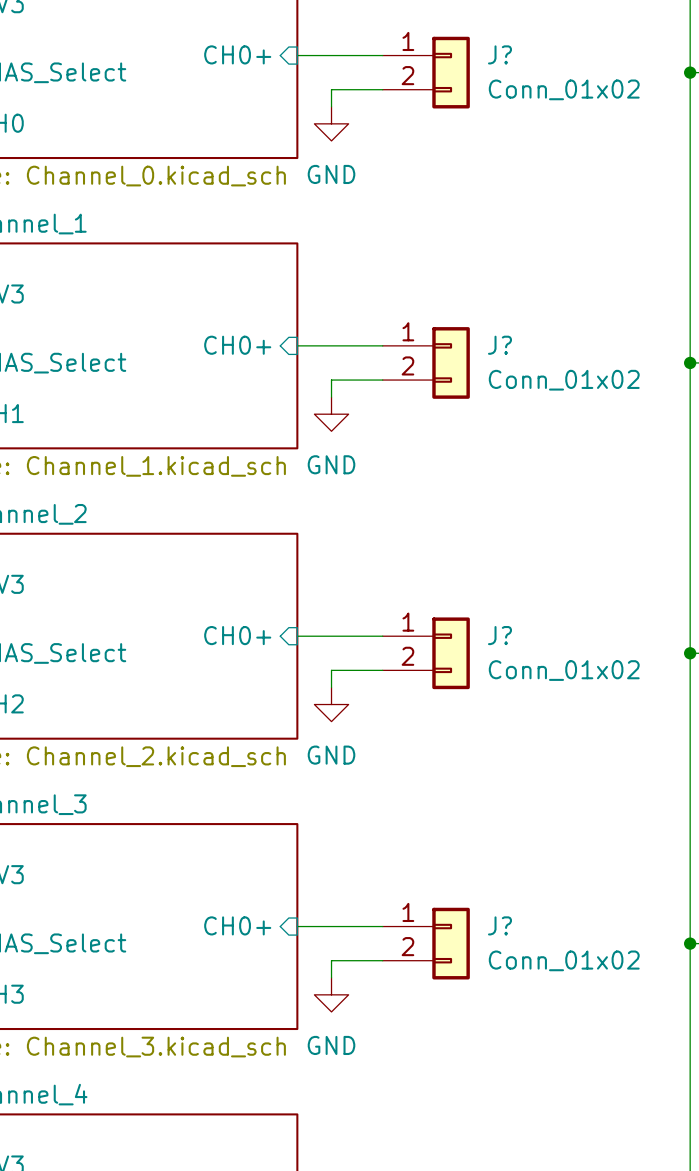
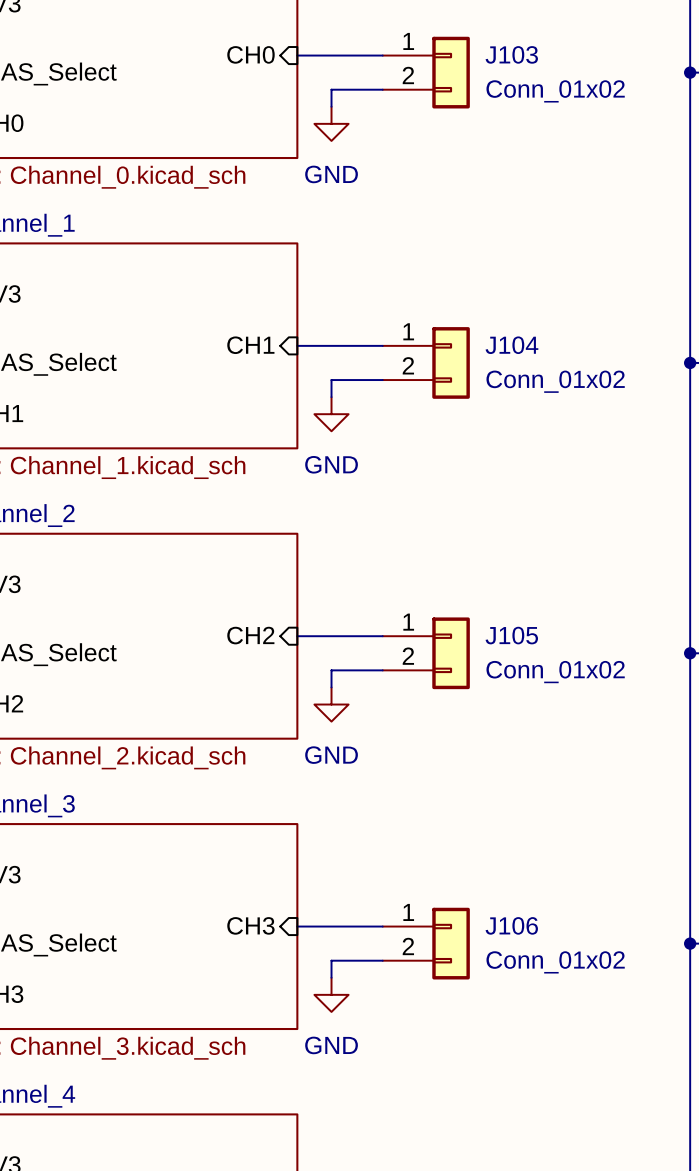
sheet pin: CH0+ (237, 54) -> CH0 (250, 54)
J? name: J? (499, 54) -> J103 (511, 54)
sheet pin: CH0+ (237, 345) -> CH1 (250, 345)
J? name: J? (499, 345) -> J104 (511, 345)
sheet pin: CH0+ (237, 635) -> CH2 (250, 635)
J? name: J? (499, 635) -> J105 (511, 635)
sheet pin: CH0+ (237, 925) -> CH3 (250, 925)
J? name: J? (499, 925) -> J106 (511, 925)

